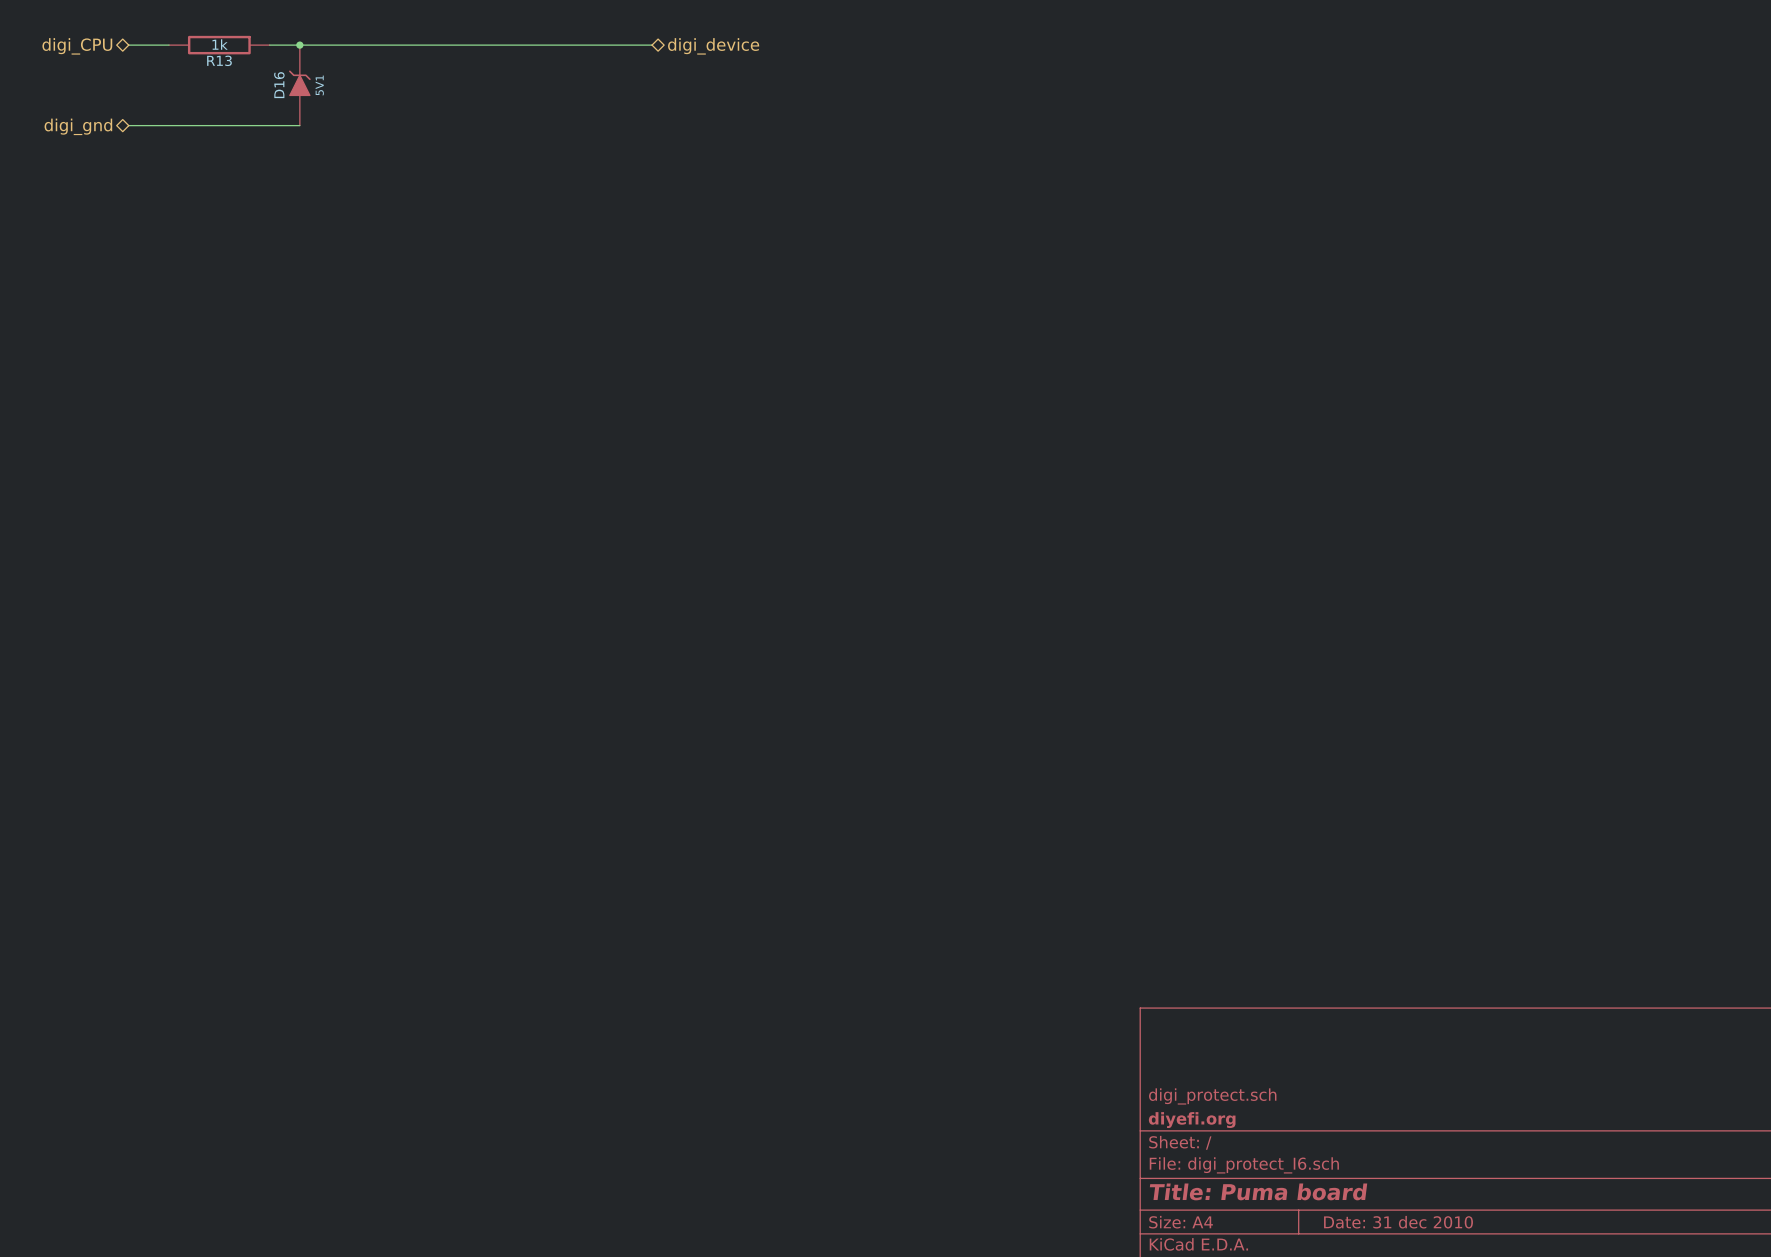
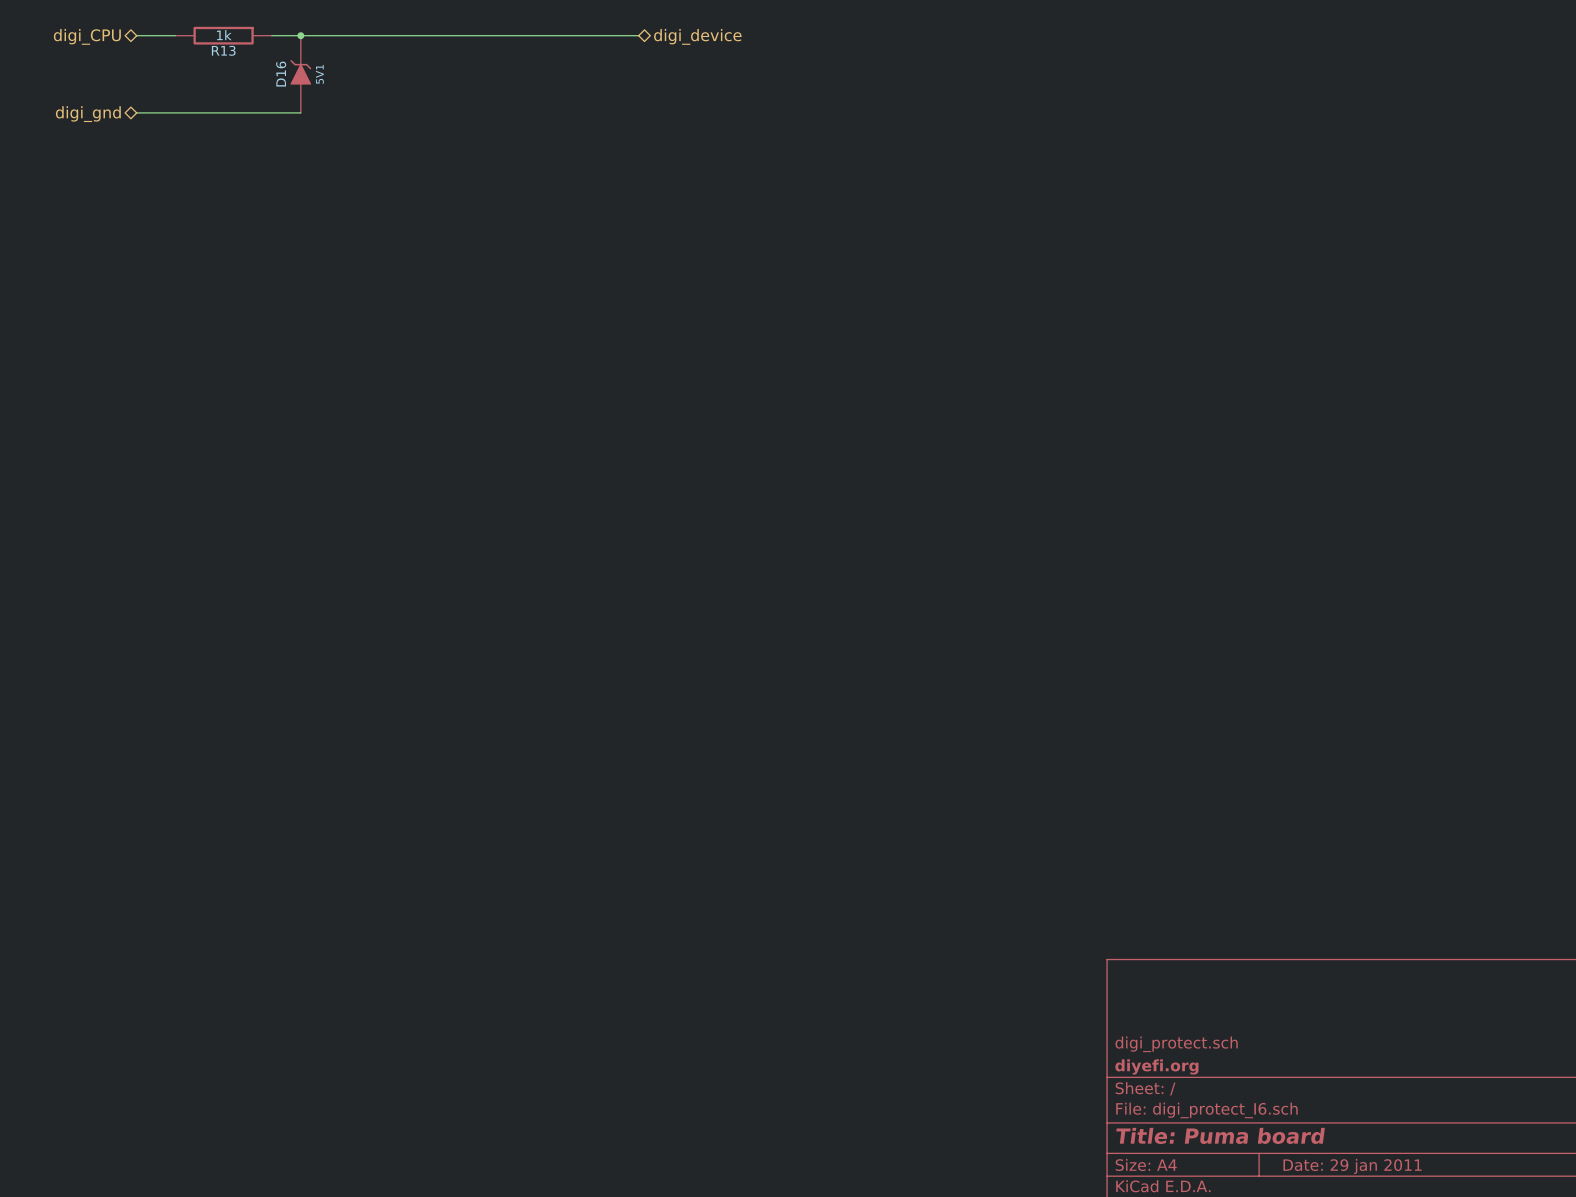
title block: Date: 31 dec 2010 (1398, 1222) -> Date: 29 jan 2011 (1352, 1166)

